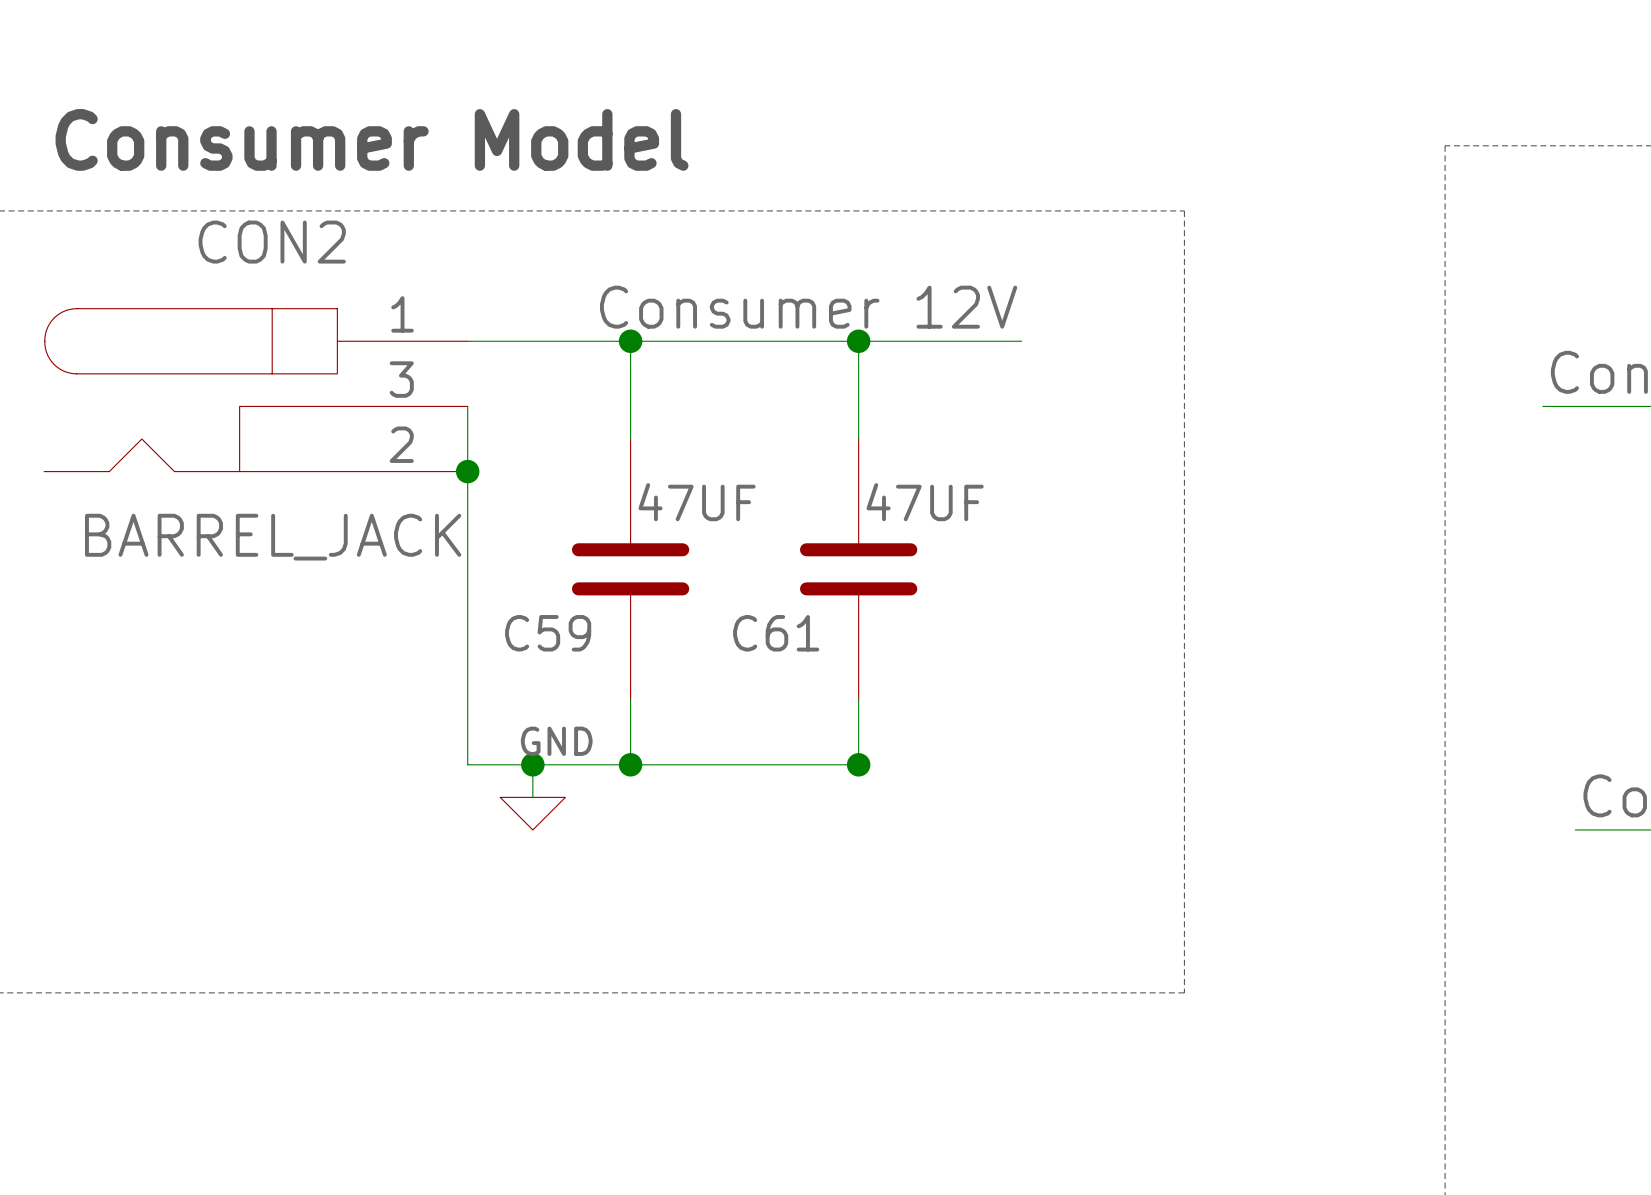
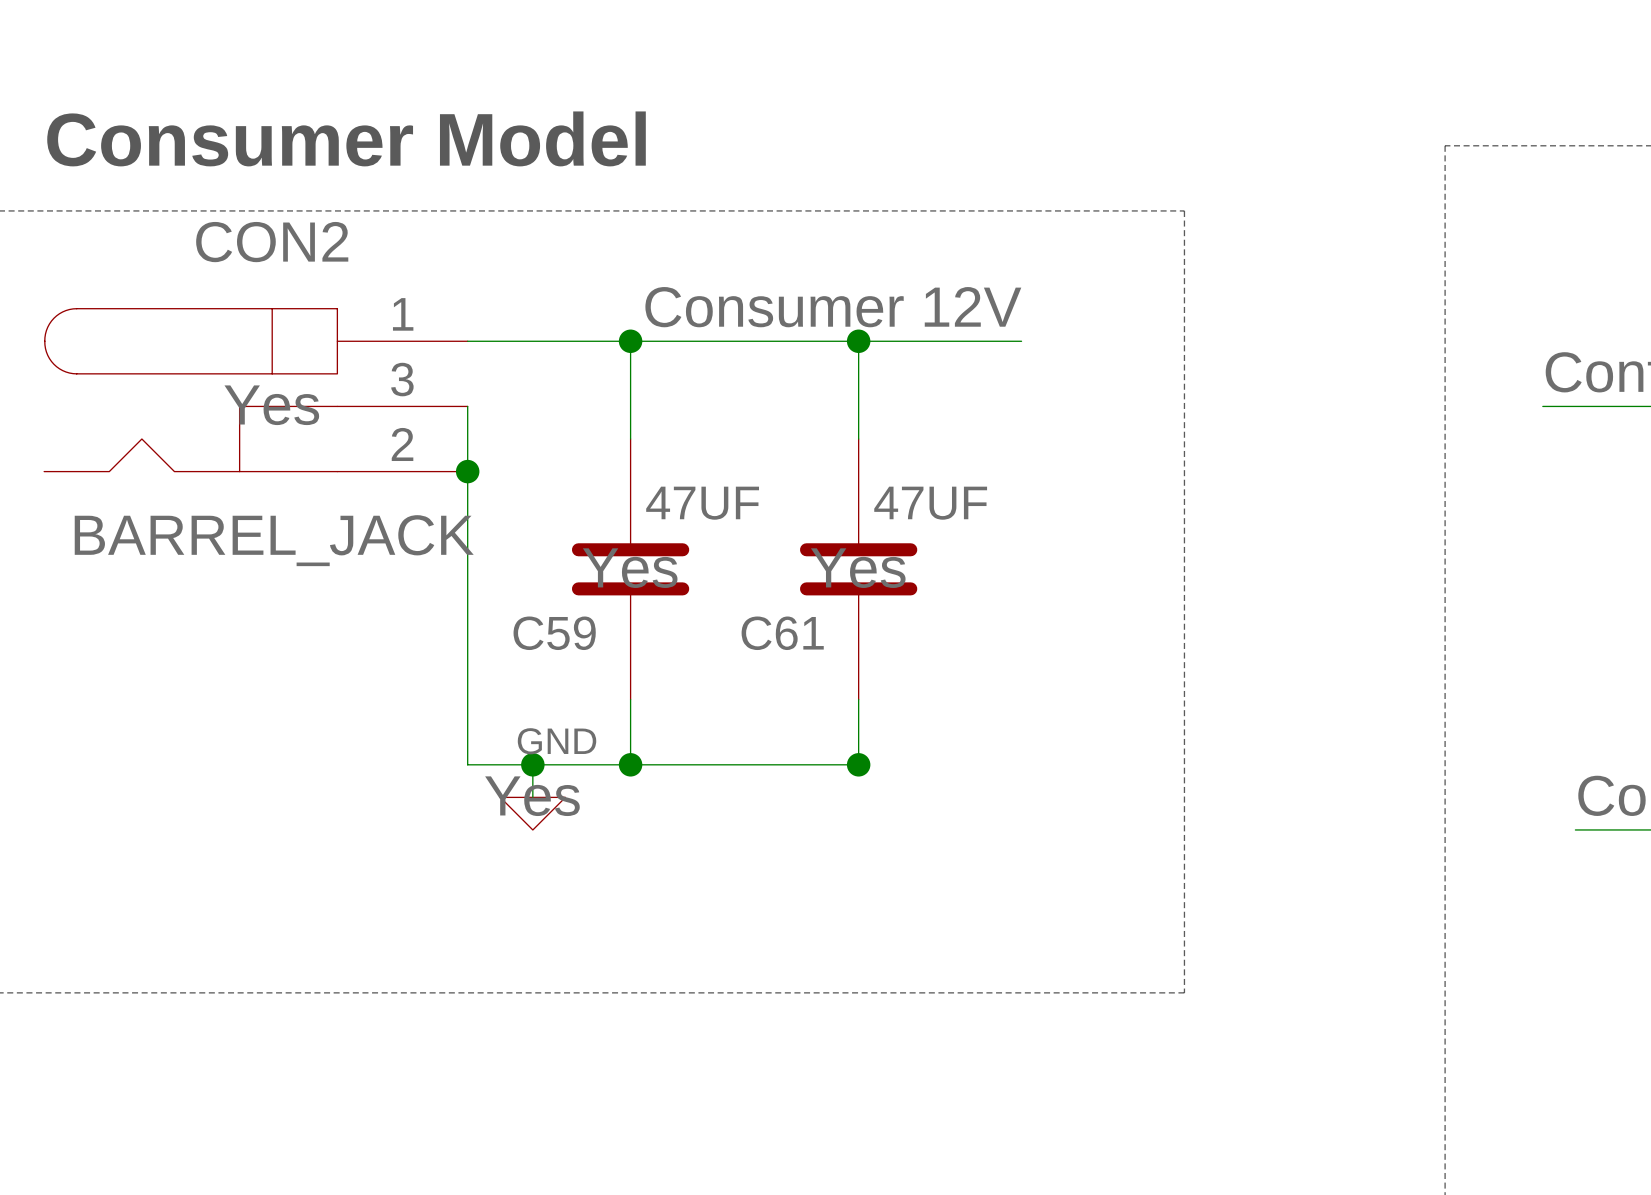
CON2 text: none -> Yes (271, 405)
C59 text: none -> Yes (630, 568)
C61 text: none -> Yes (858, 568)
power symbol text: none -> Yes (532, 796)

